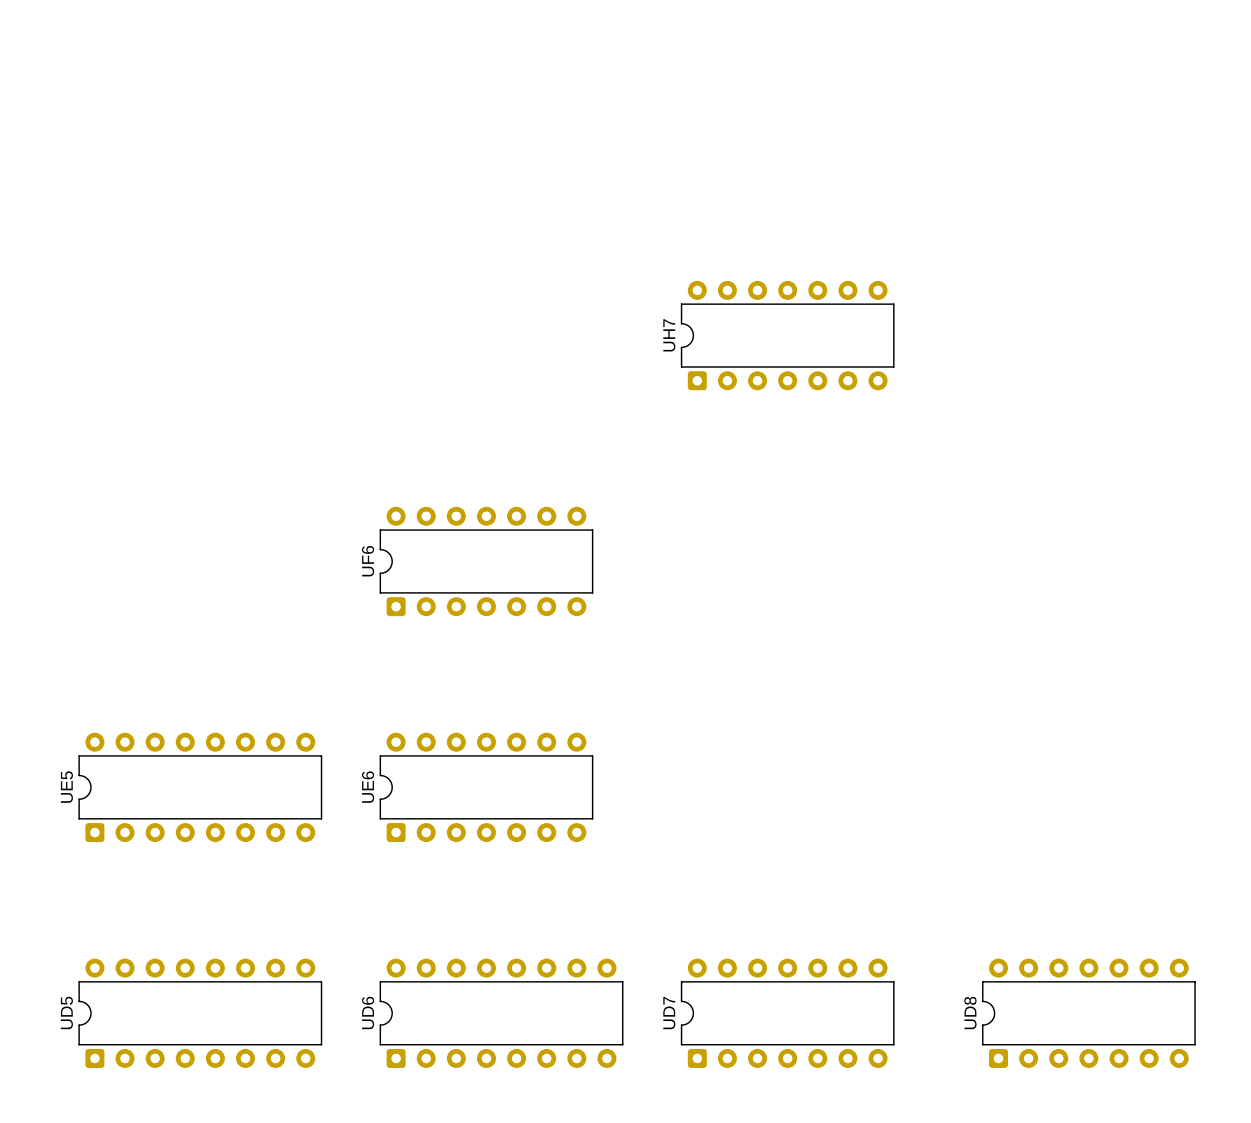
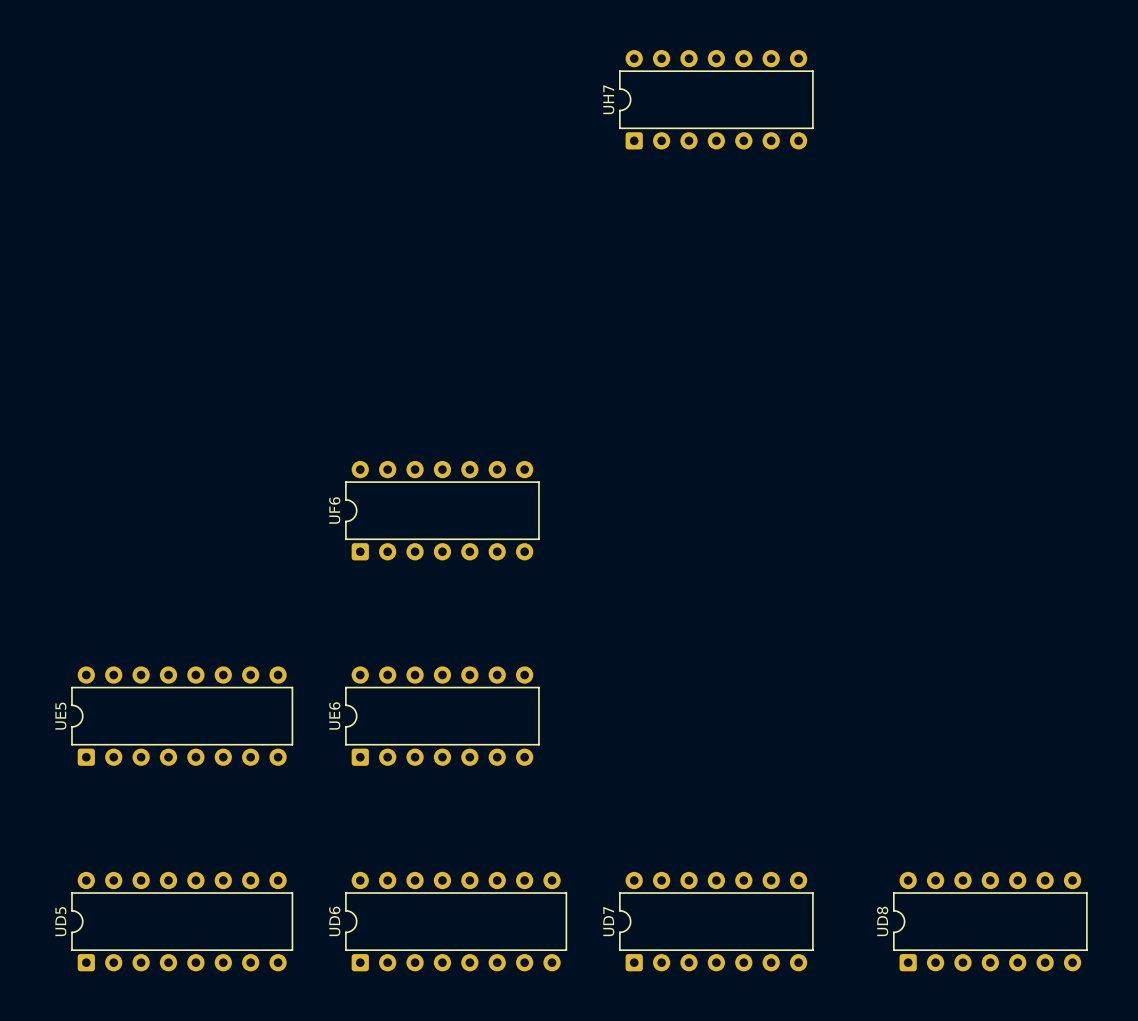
UH7 position: (787, 335) -> (716, 99)

